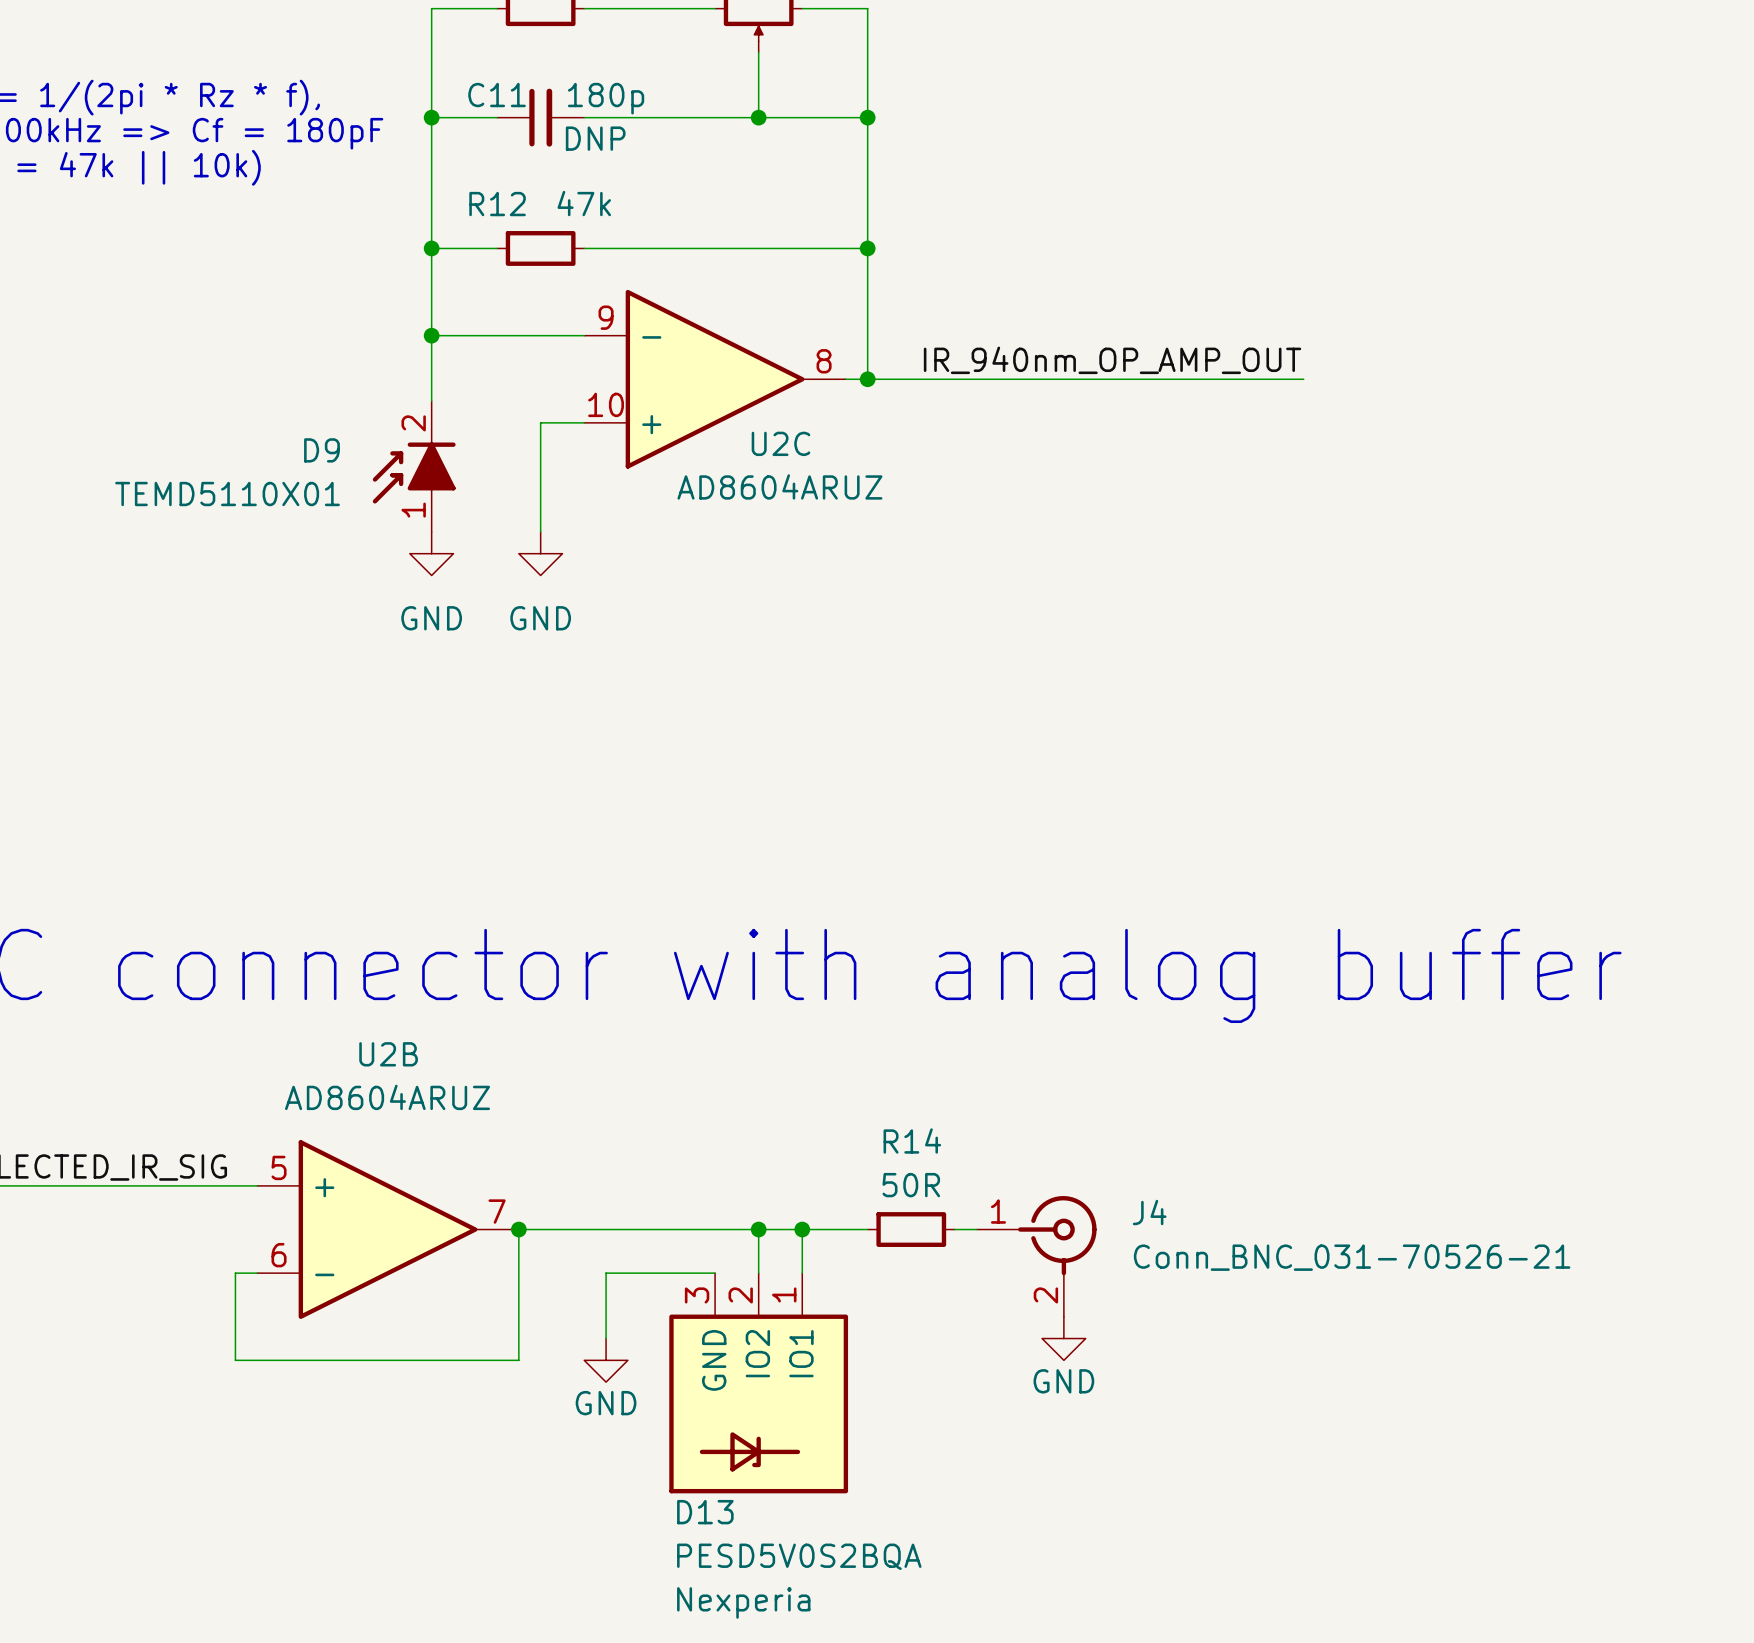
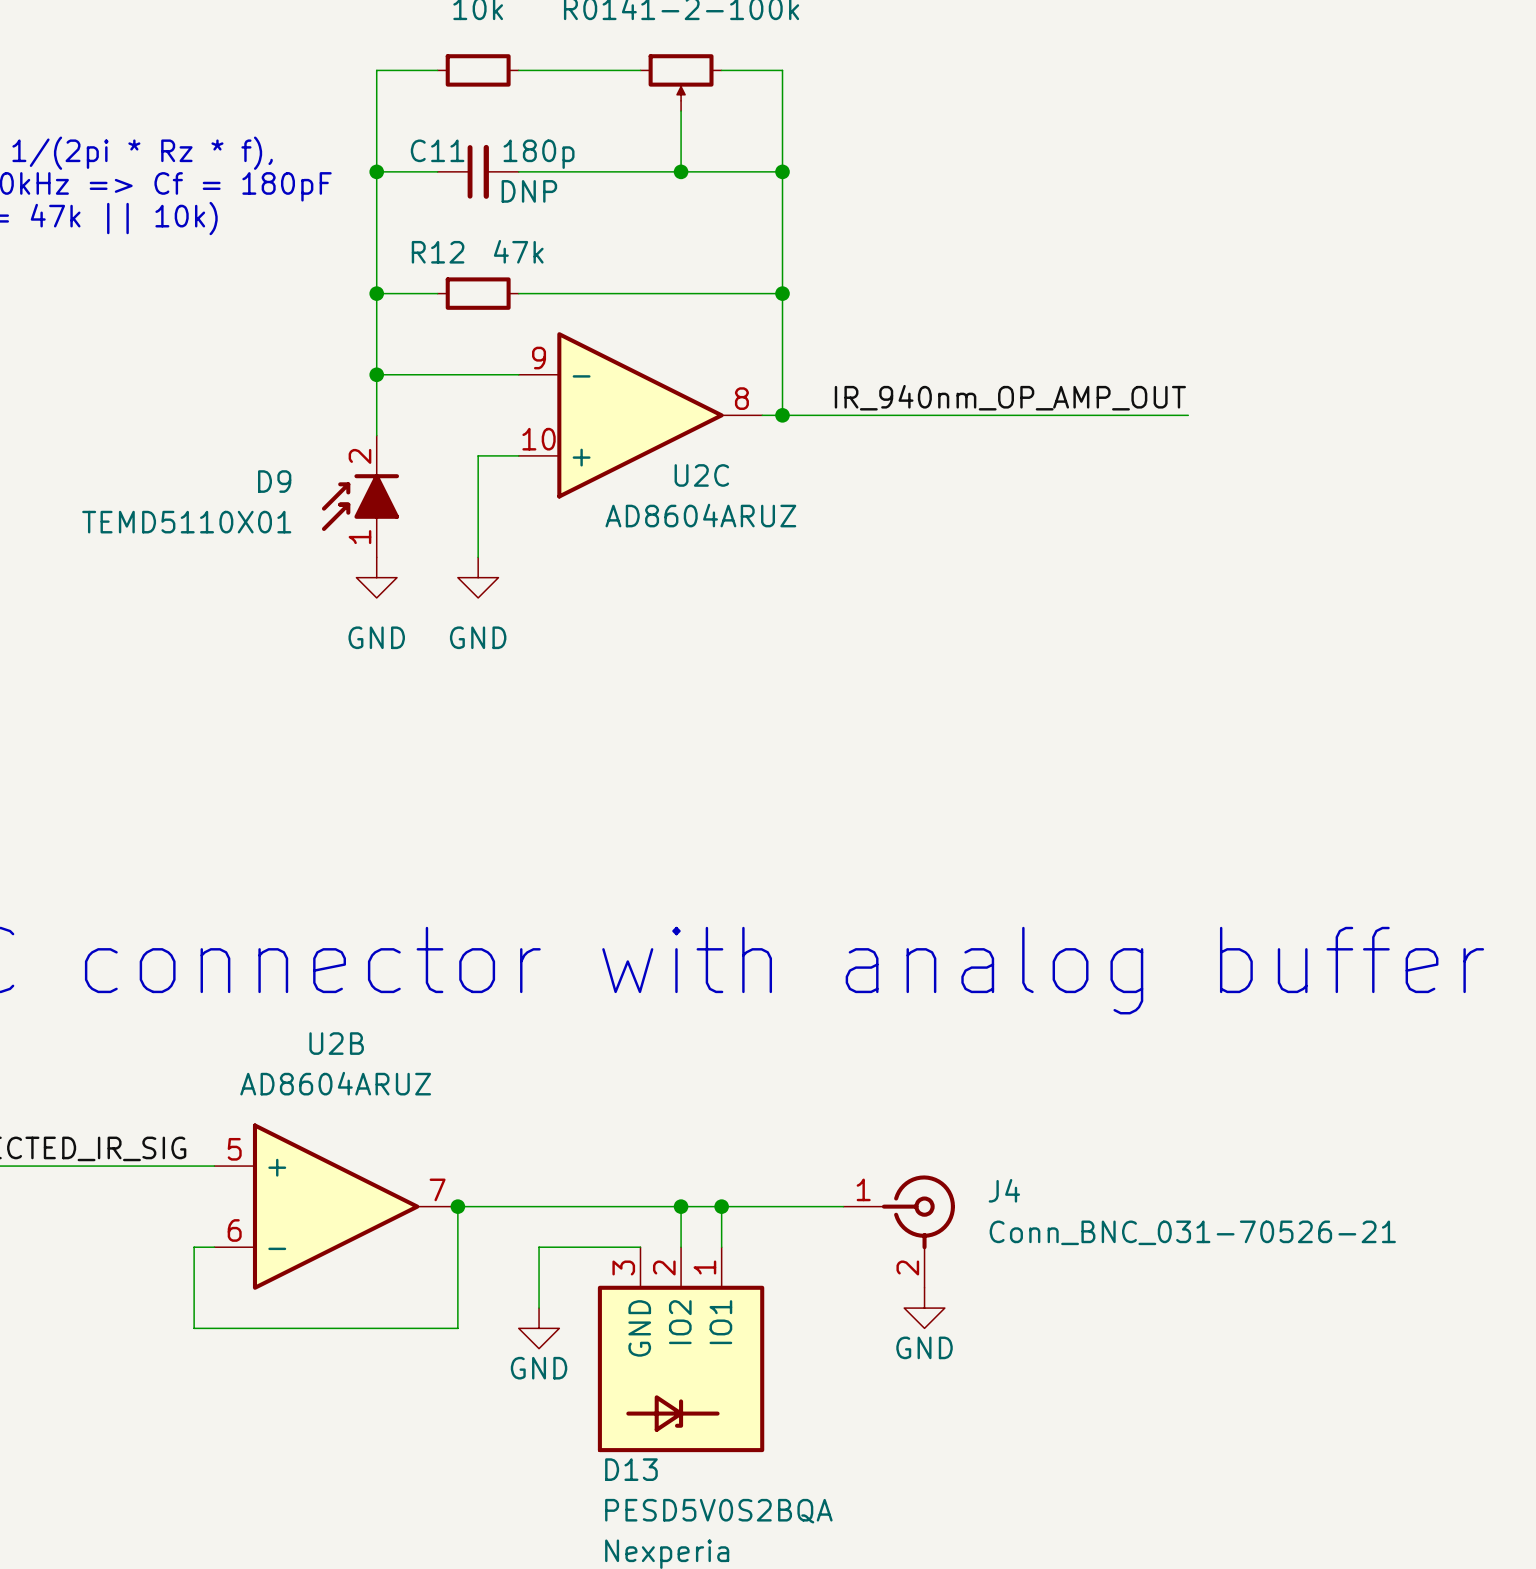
wire: none -> (782, 1206) (843, 1206)
R14: (911, 1229) -> none
J4 position: (1036, 1256) -> (899, 1231)
power symbol position: GND (1063, 1338) -> GND (924, 1308)

